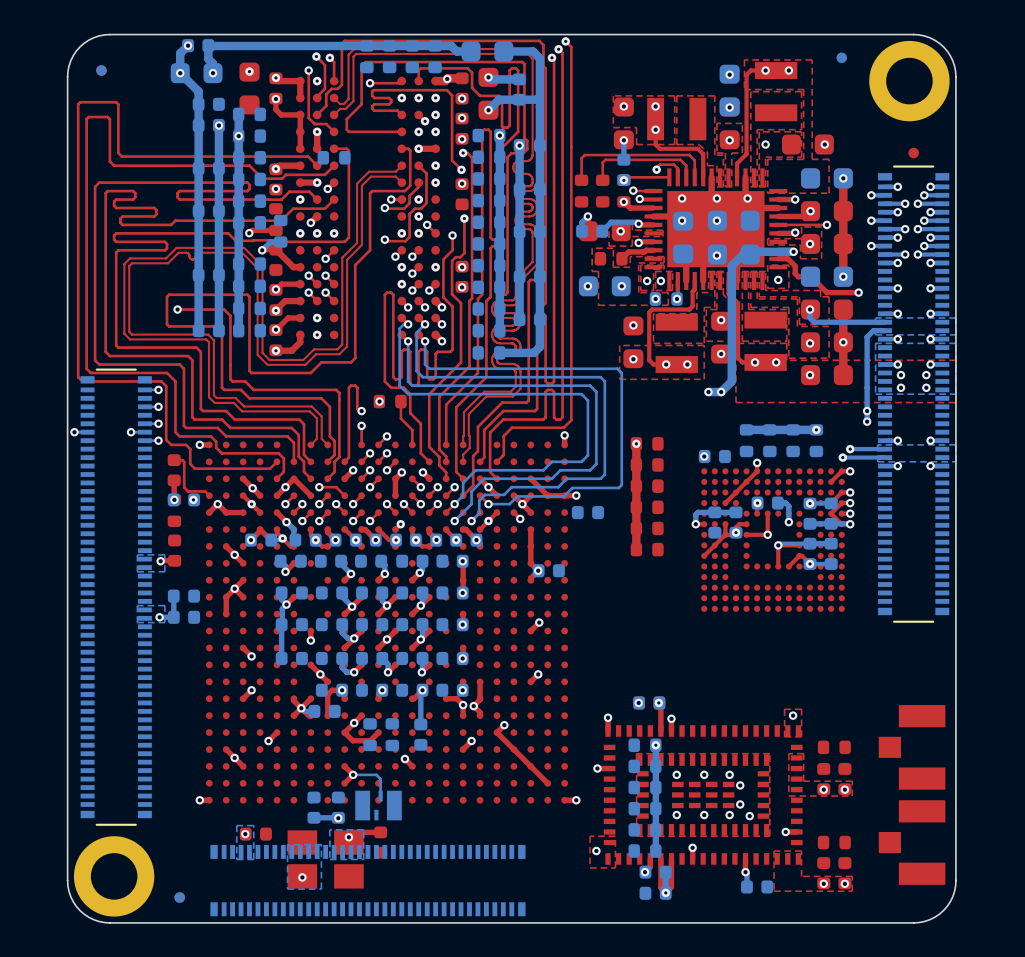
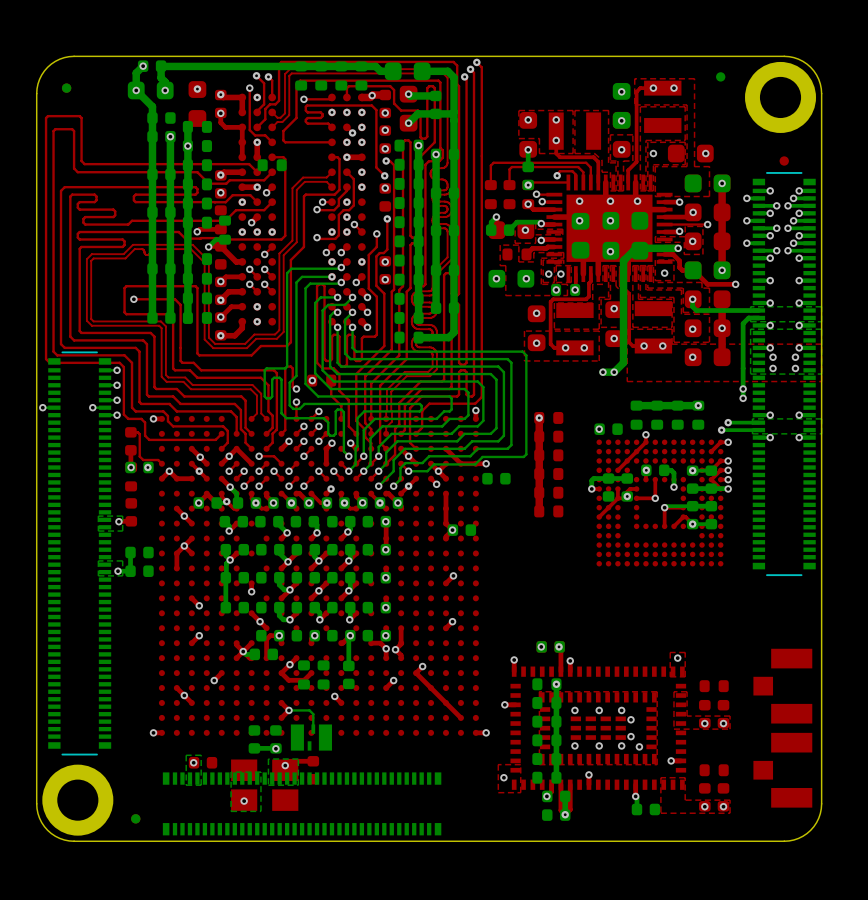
bottom track: none -> (341, 267) (291, 268) (287, 273) (287, 366) (285, 368) (266, 368) (264, 370) (264, 396) (266, 398) (272, 396) (272, 379) (279, 377) (281, 379) (281, 413) (286, 418) (323, 418) (328, 422) (328, 433) (330, 435) (335, 433) (335, 411) (341, 409) (343, 412) (343, 451) (348, 456)
bottom track: none -> (331, 276) (302, 276) (296, 282) (296, 375) (289, 382) (289, 405) (293, 408) (299, 408) (304, 403) (419, 403) (421, 405) (419, 411) (364, 411) (357, 418) (355, 464) (348, 471)
bottom track: none -> (341, 282) (310, 283) (305, 288) (305, 383) (318, 396) (449, 396) (451, 398) (451, 409) (444, 411) (436, 418) (374, 418) (363, 430) (363, 456)
bottom track: none -> (337, 297) (320, 297) (315, 303) (315, 373) (330, 389) (464, 389) (468, 392) (468, 415) (464, 418) (449, 418) (442, 426) (382, 426) (370, 438) (370, 464) (363, 471)
bottom track: none -> (352, 297) (345, 304) (328, 304) (322, 310) (322, 370) (333, 381) (477, 381) (483, 387) (483, 420) (477, 426) (459, 426) (451, 433) (391, 433) (378, 446) (378, 456)

